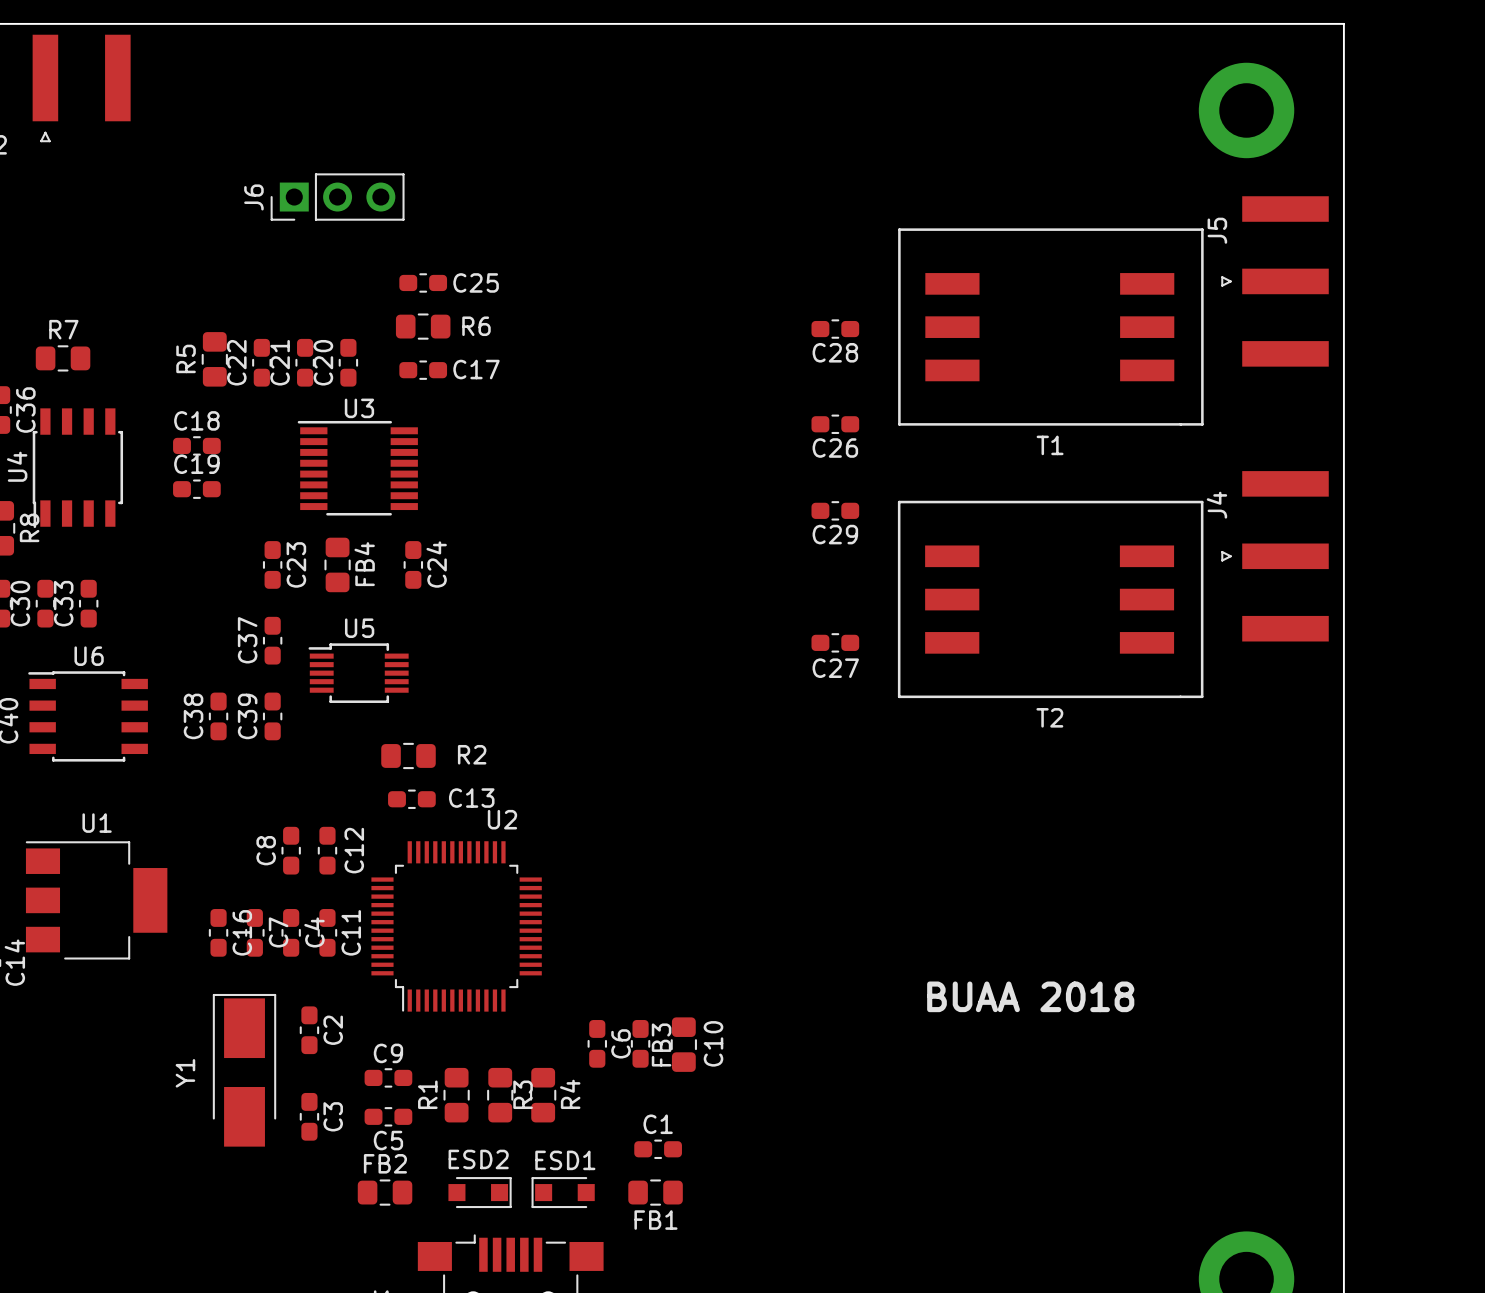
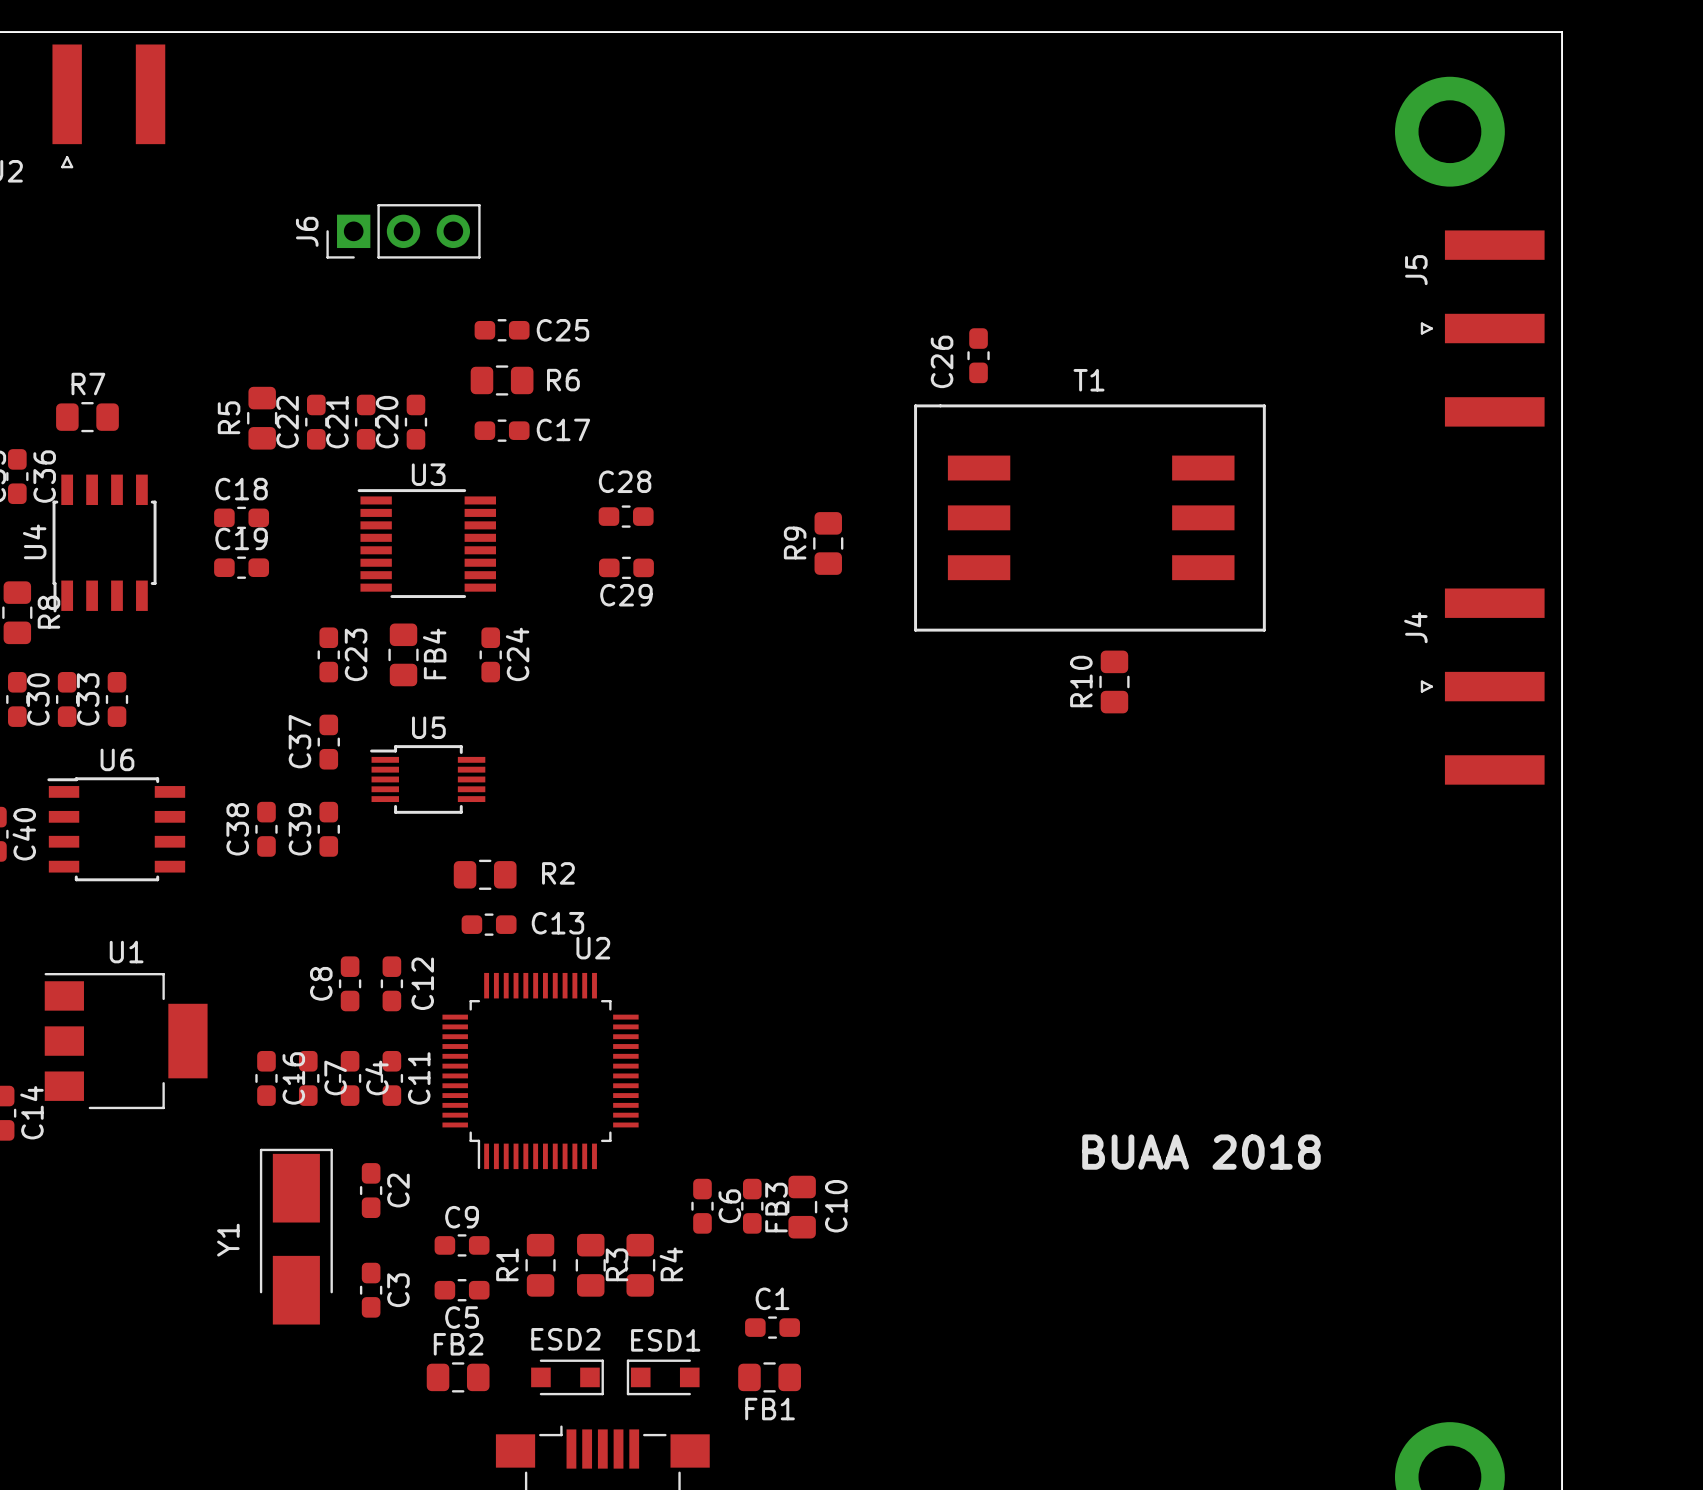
T1 rotation: 0° (1050, 327) -> 180° (1089, 518)
C28 position: (835, 329) -> (626, 516)
C28 name position: C28 (835, 352) -> C28 (625, 481)
C26 rotation: 0° (835, 424) -> 90° clockwise (978, 355)
C26 position: (835, 424) -> (978, 355)
R9: none -> (828, 543)
C29 position: (835, 510) -> (626, 567)
J4 position: (1275, 556) -> (1482, 686)
R10: none -> (1114, 681)
T2: (1050, 599) -> none
C27: (835, 642) -> none

